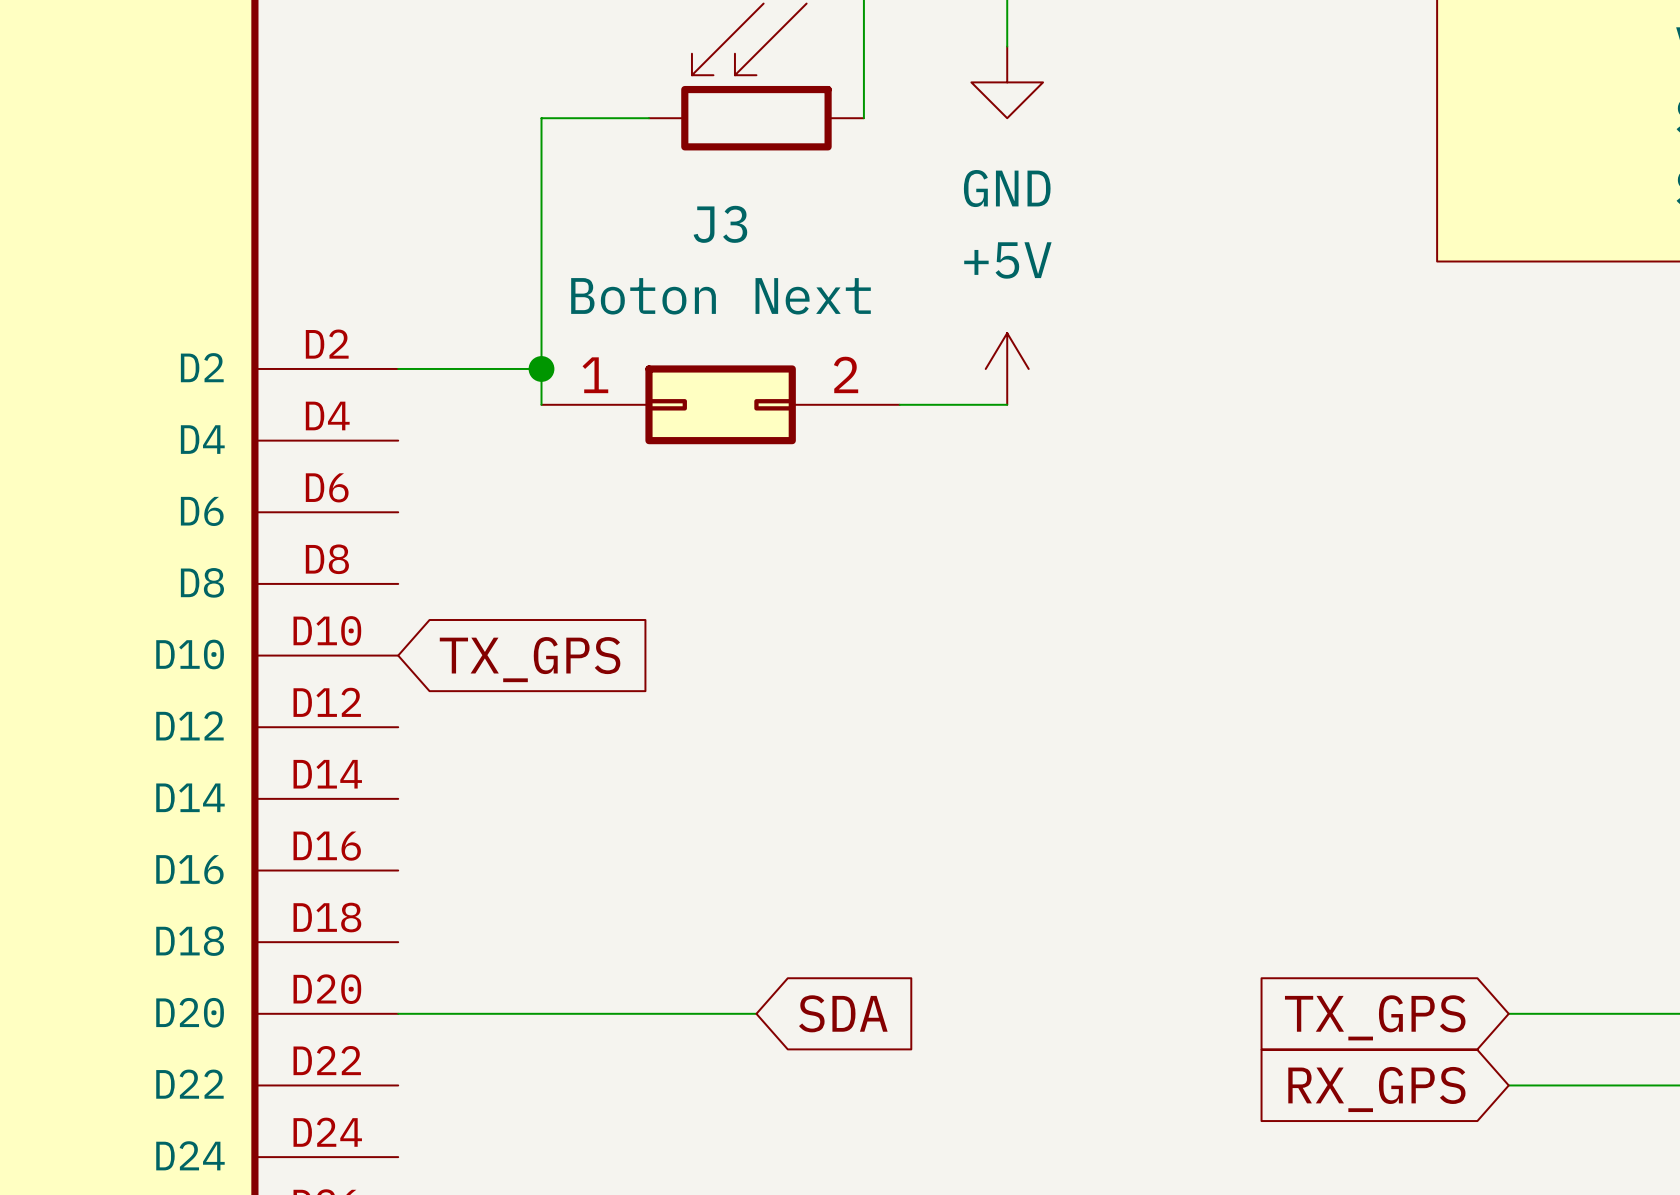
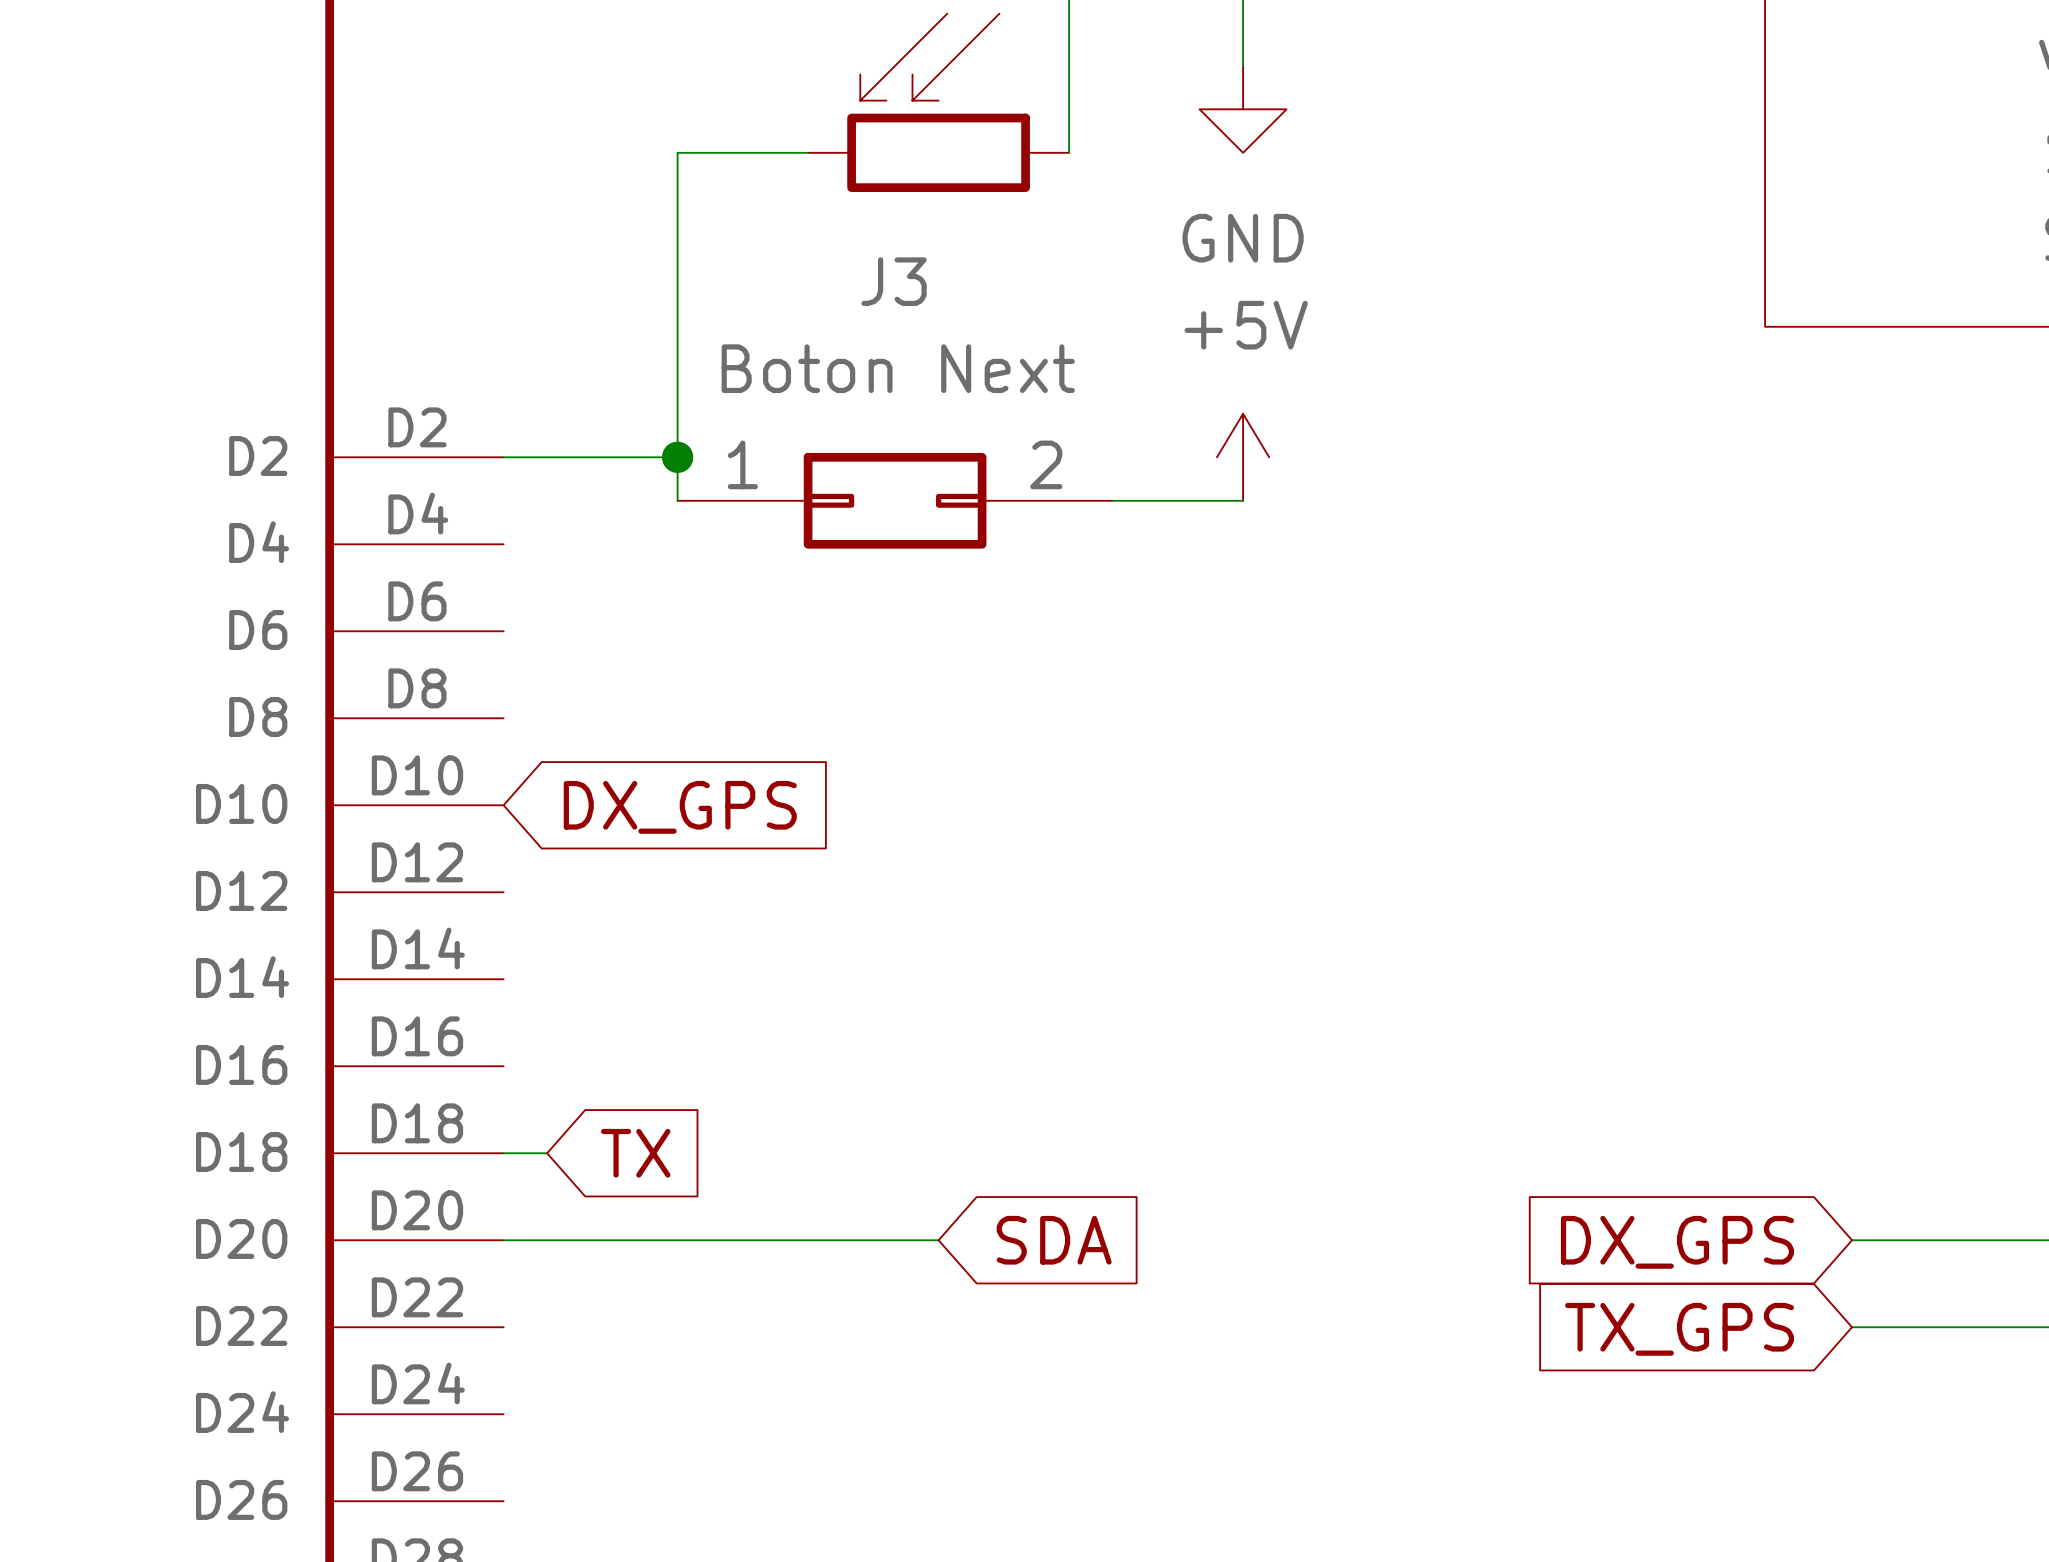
global label: TX_GPS (530, 659) -> DX_GPS (680, 807)
wire: none -> (503, 1153) (547, 1153)
global label: none -> TX (635, 1153)
global label: TX_GPS (1375, 1017) -> DX_GPS (1677, 1242)
global label: RX_GPS (1376, 1089) -> TX_GPS (1679, 1329)

